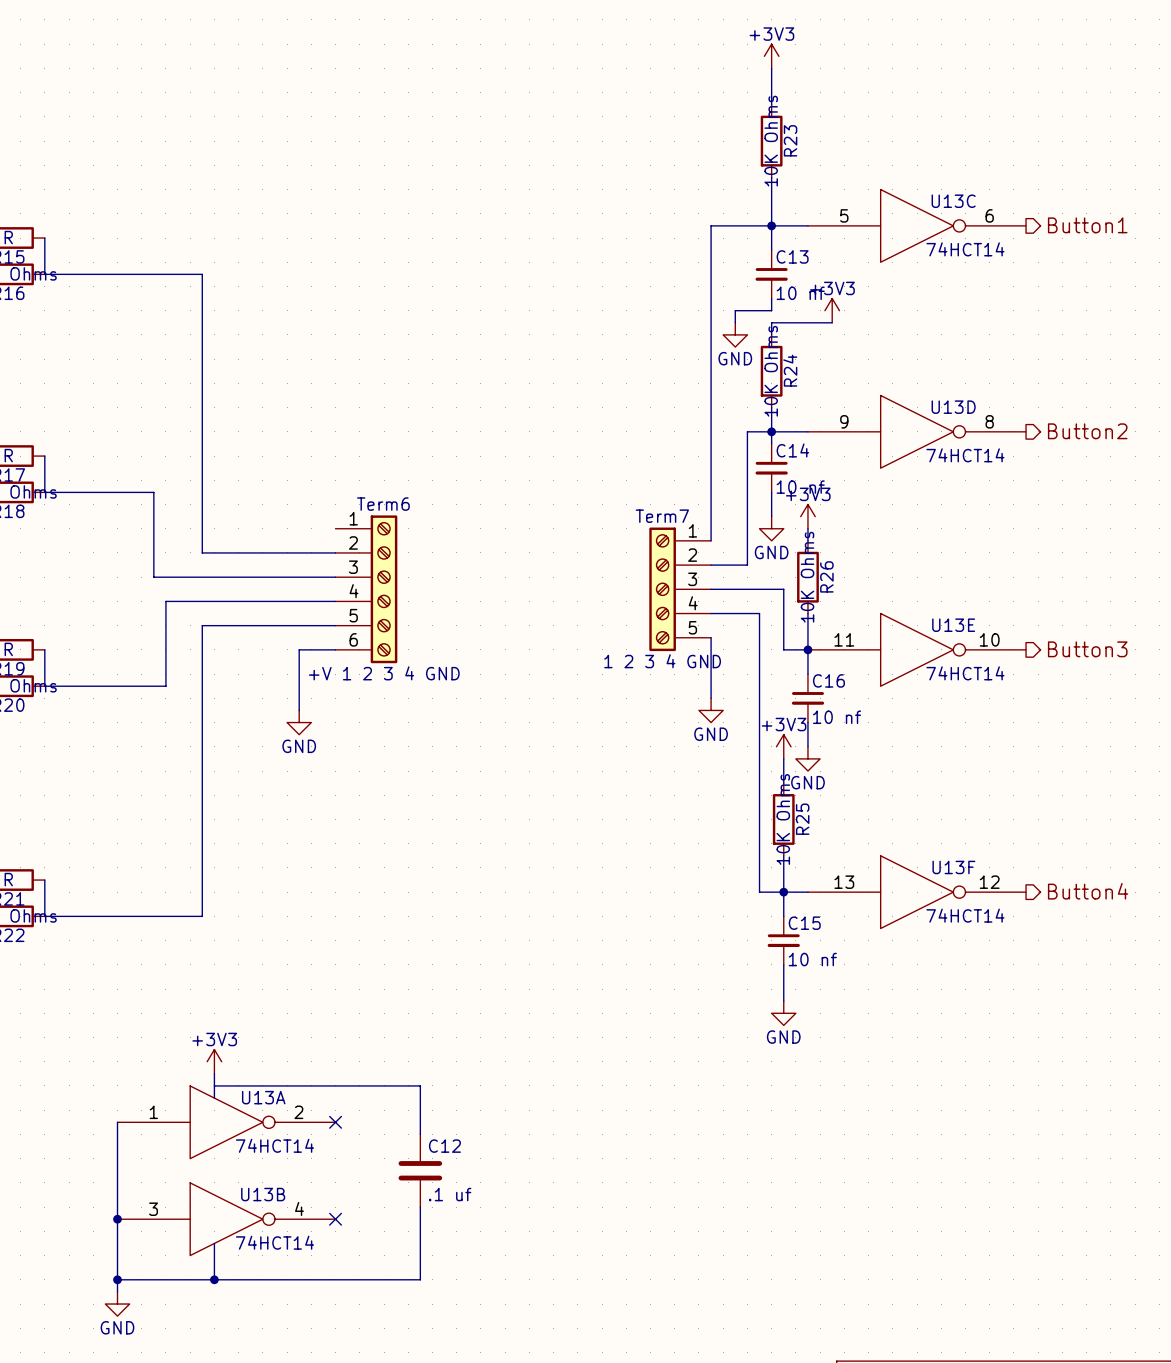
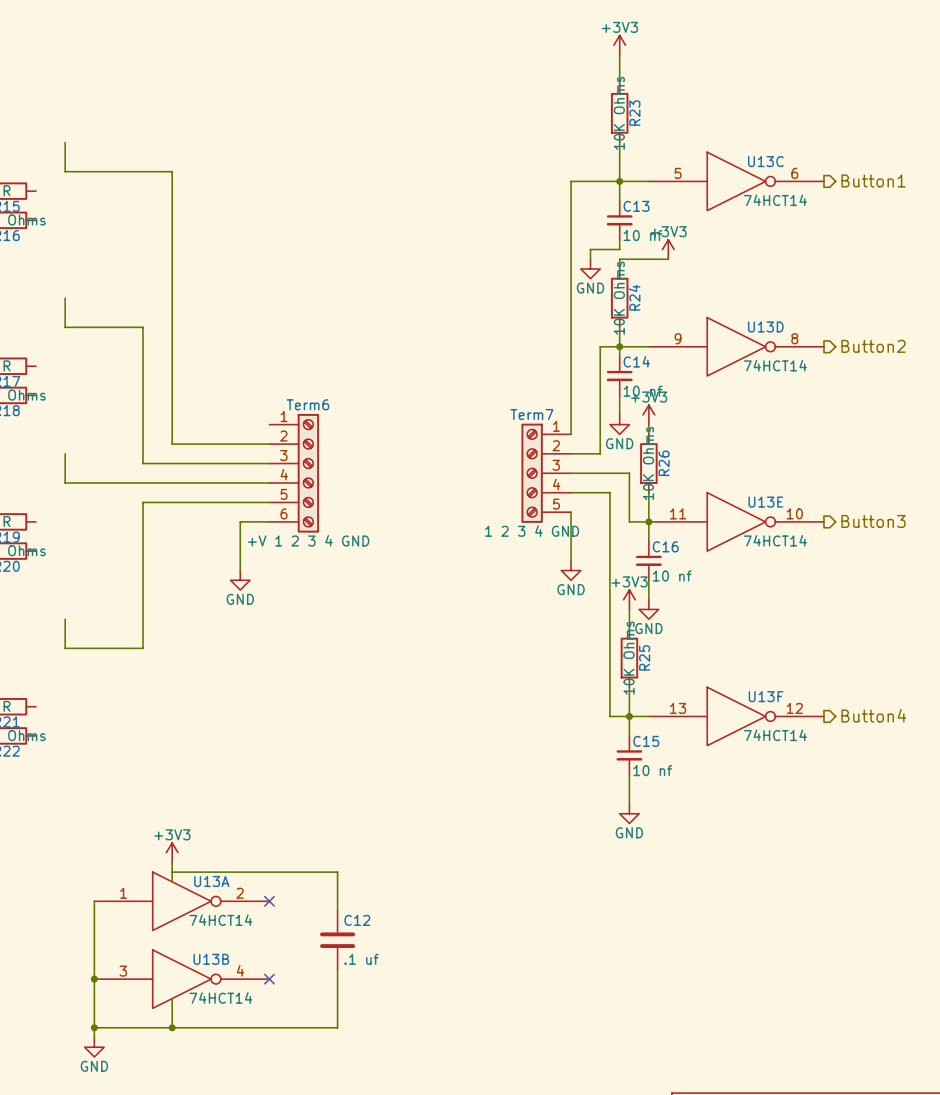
wire: (44, 238) (44, 274) (202, 274) (202, 552) (214, 552) -> (65, 142) (65, 171) (172, 171) (172, 444)
wire: (44, 456) (44, 492) (153, 492) (153, 577) (178, 577) -> (65, 298) (65, 327) (143, 327) (143, 463)
wire: (165, 601) (165, 686) (44, 686) (44, 649) -> (133, 482) (65, 482) (65, 453)
wire: (202, 625) (202, 916) (44, 916) (44, 880) -> (162, 502) (143, 502) (143, 648) (65, 648) (65, 619)

